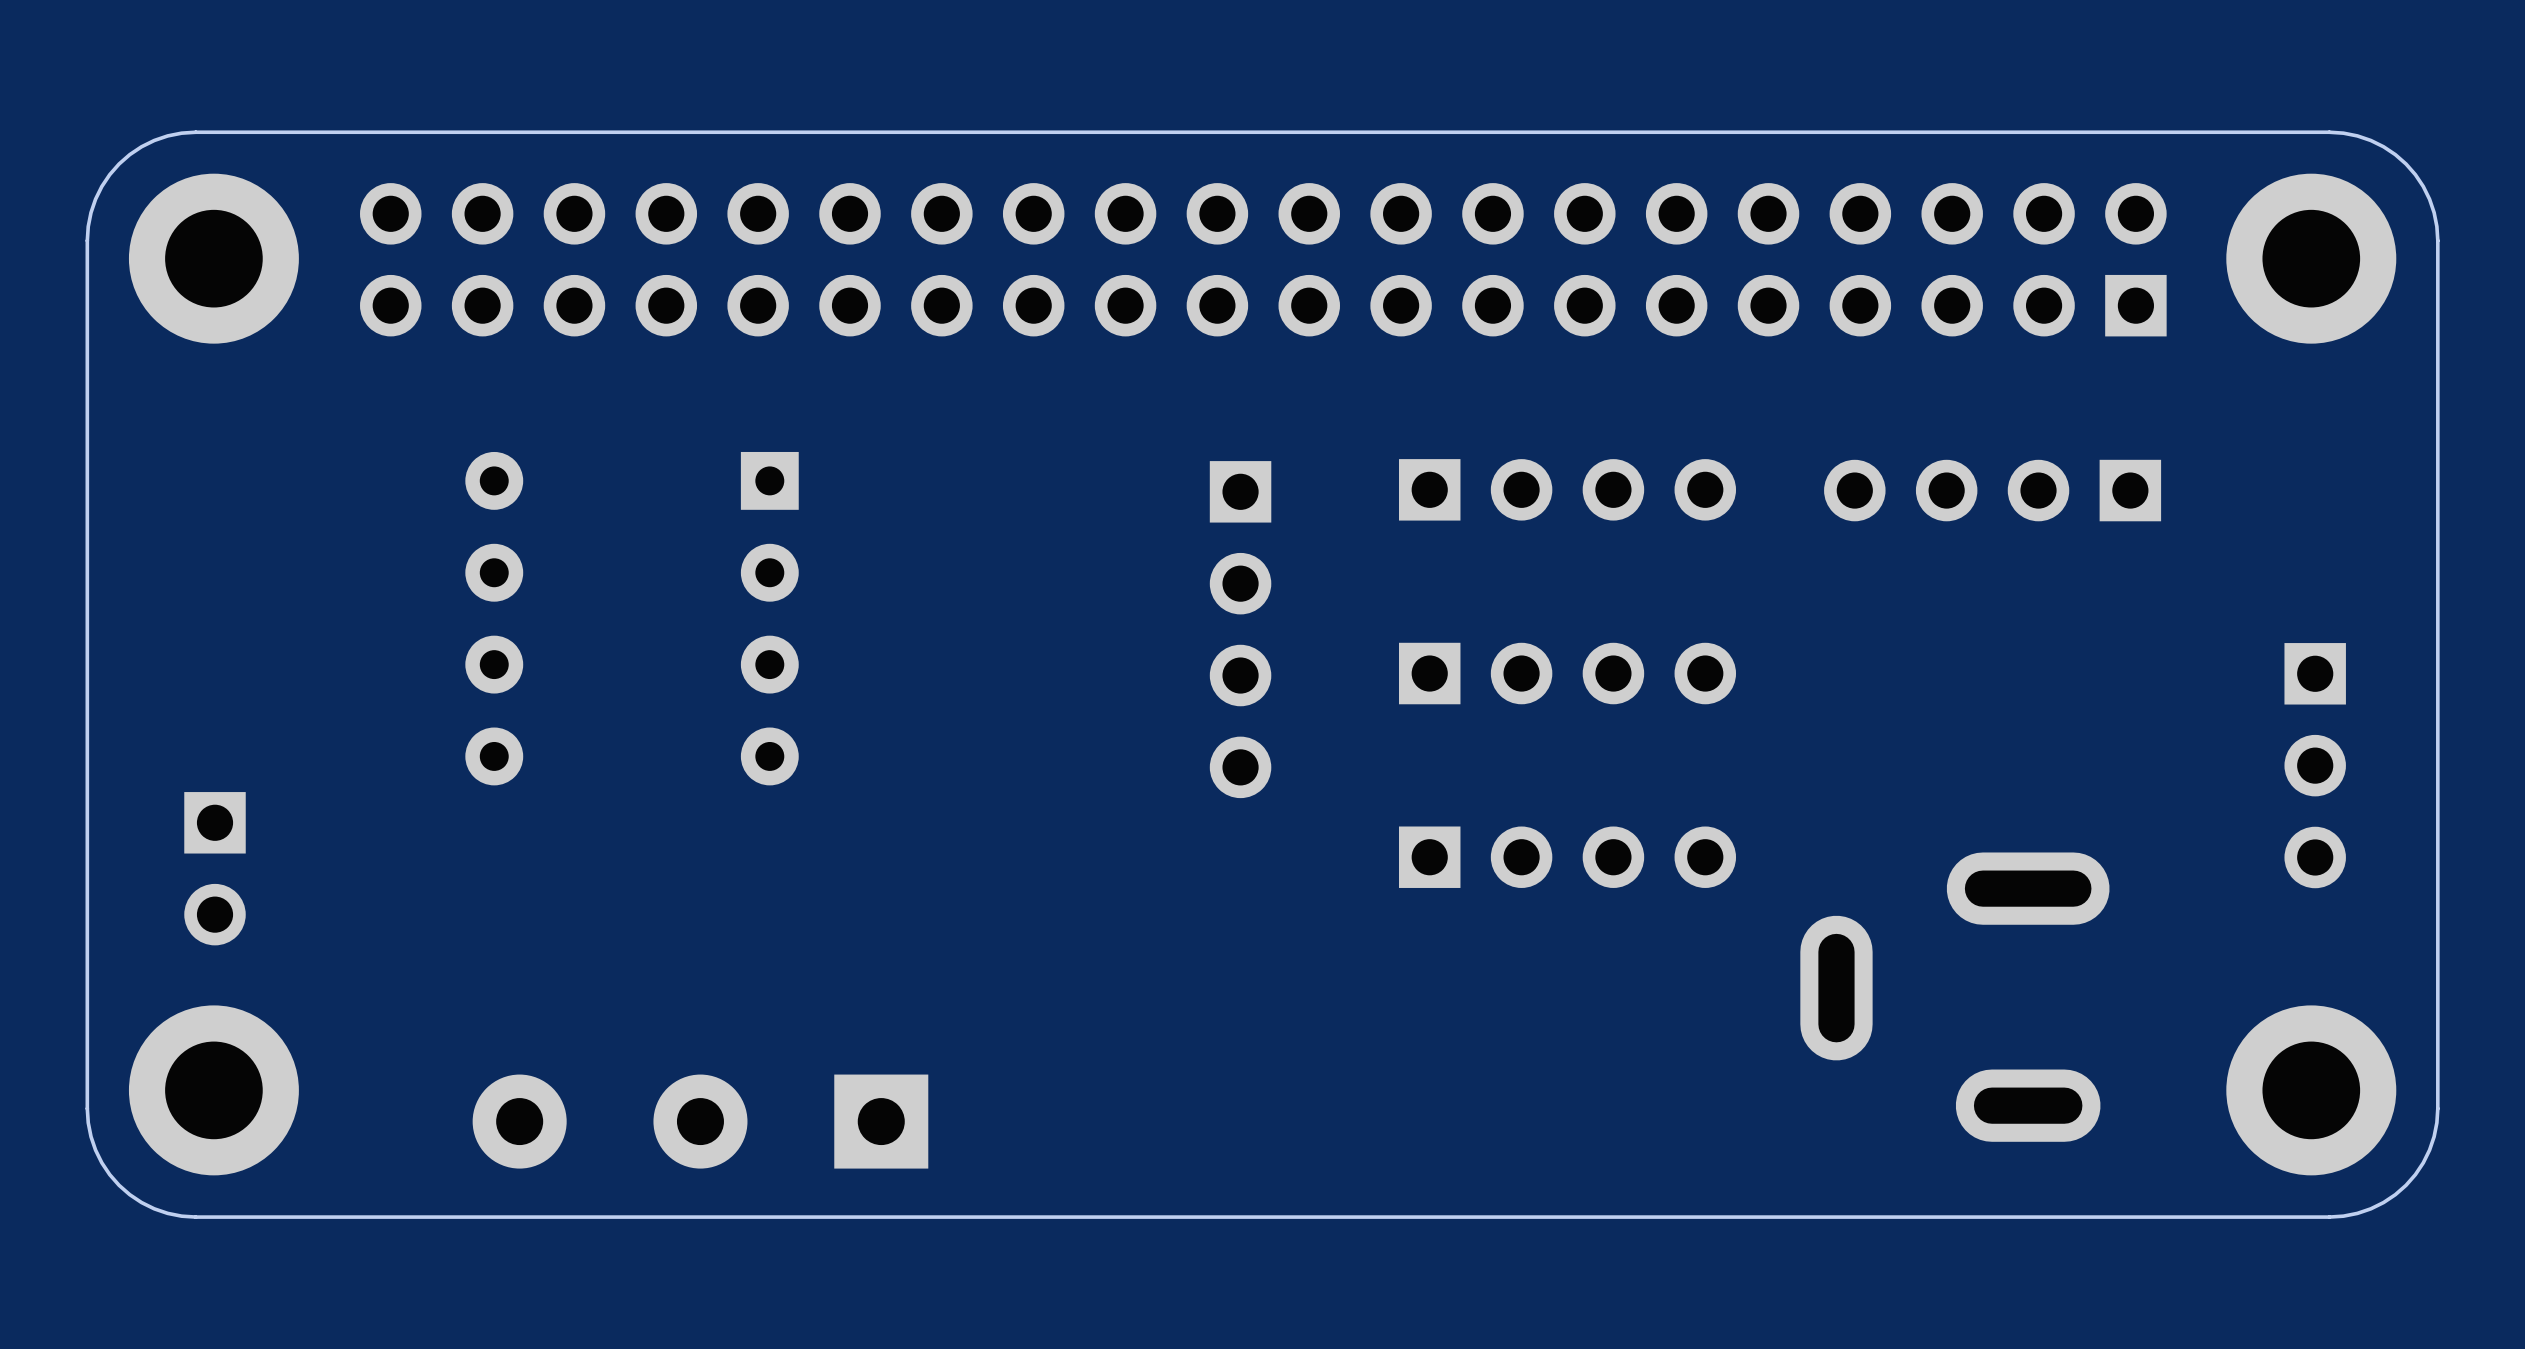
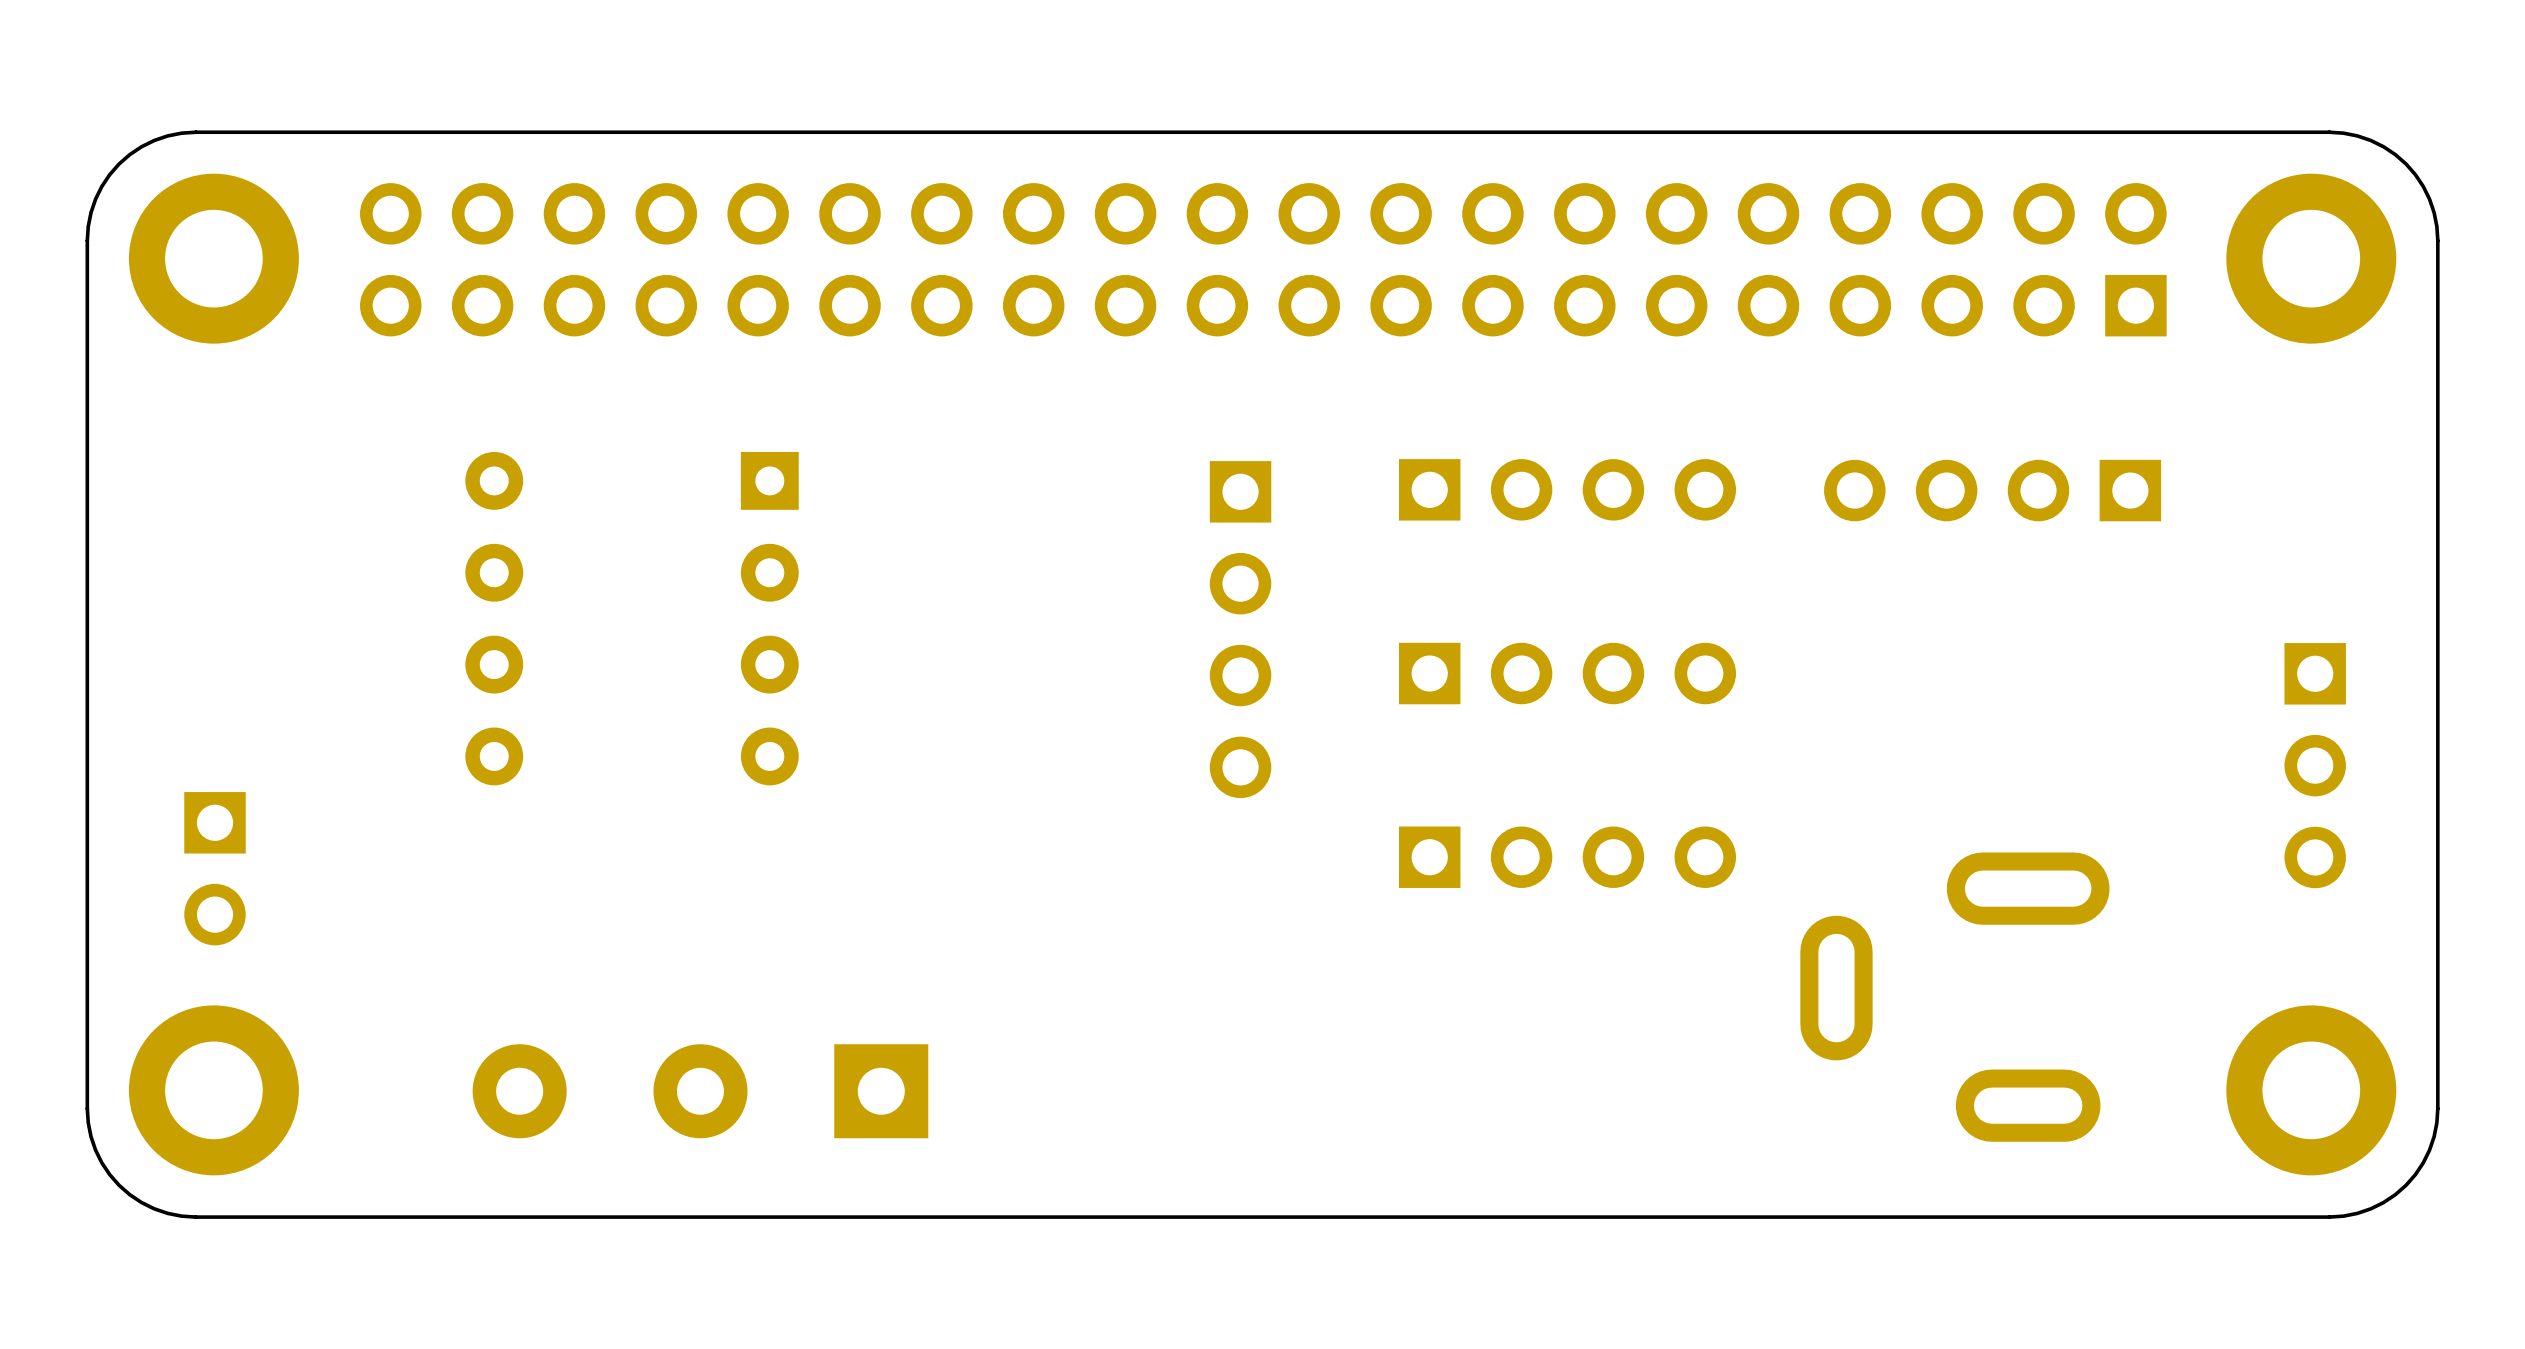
part position: (700, 1121) -> (700, 1091)

